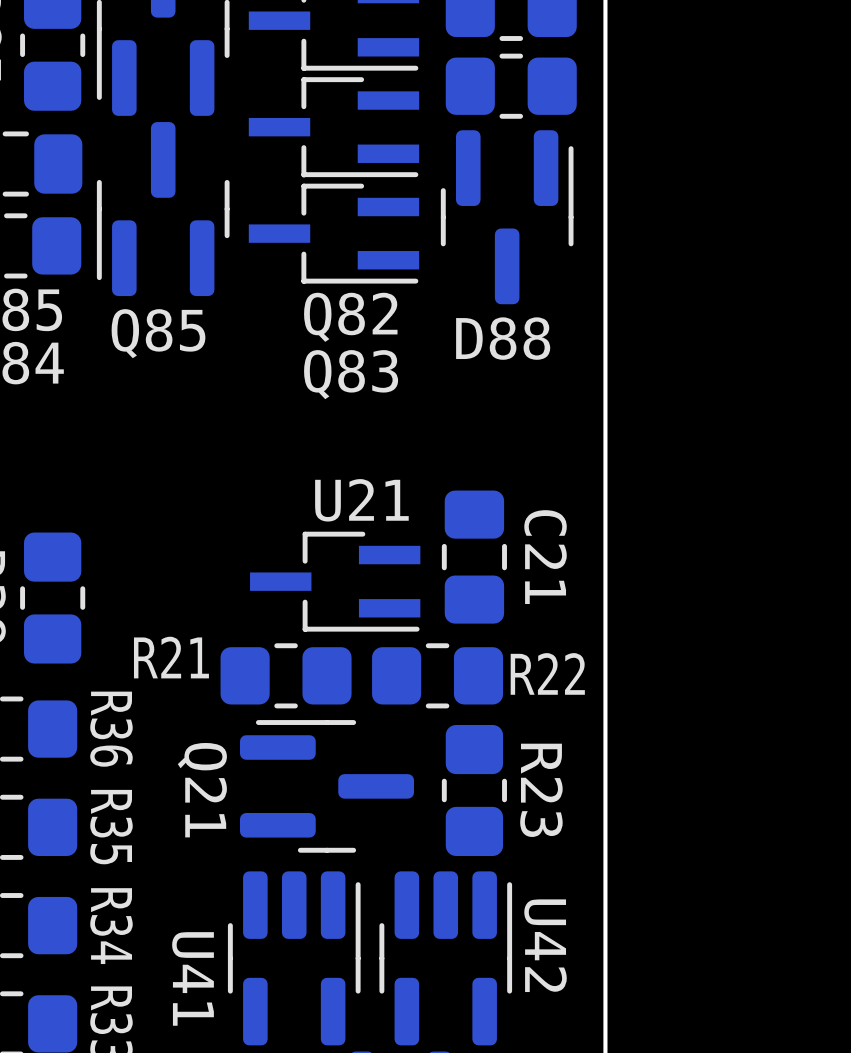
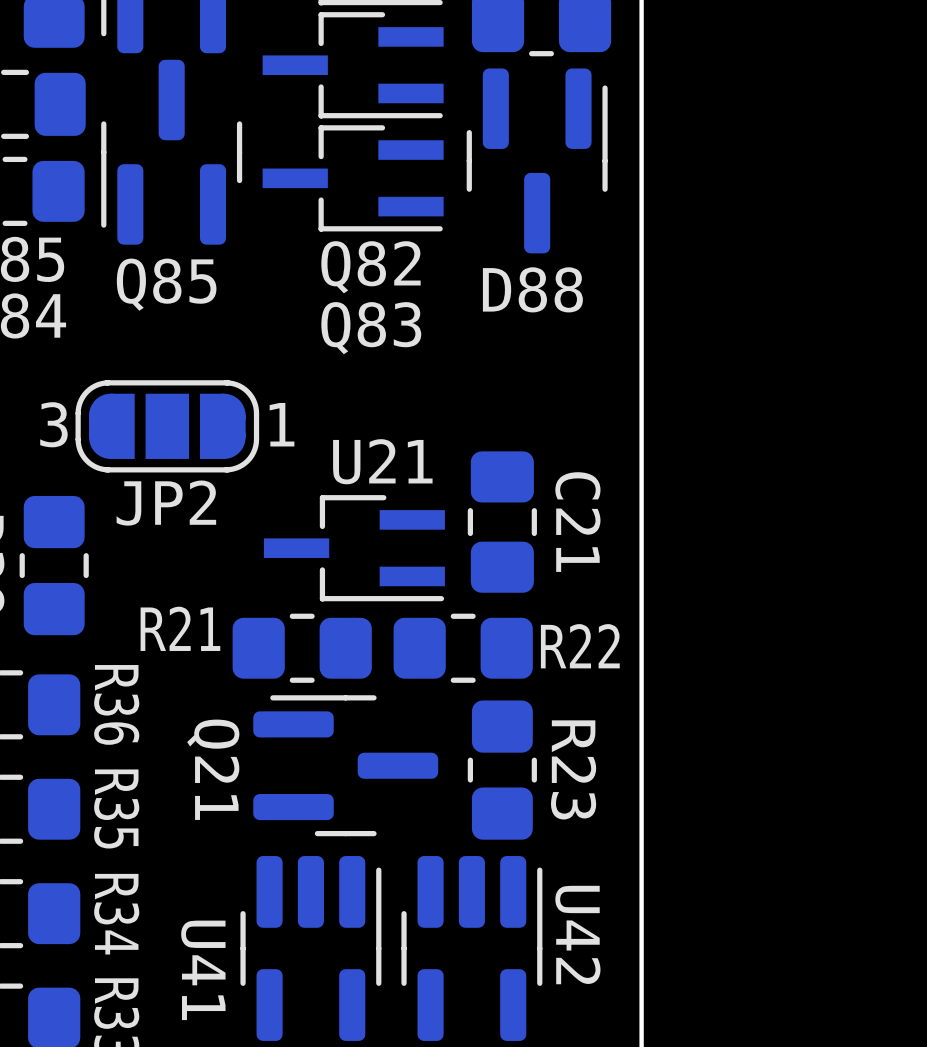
JP2: none -> (167, 426)

